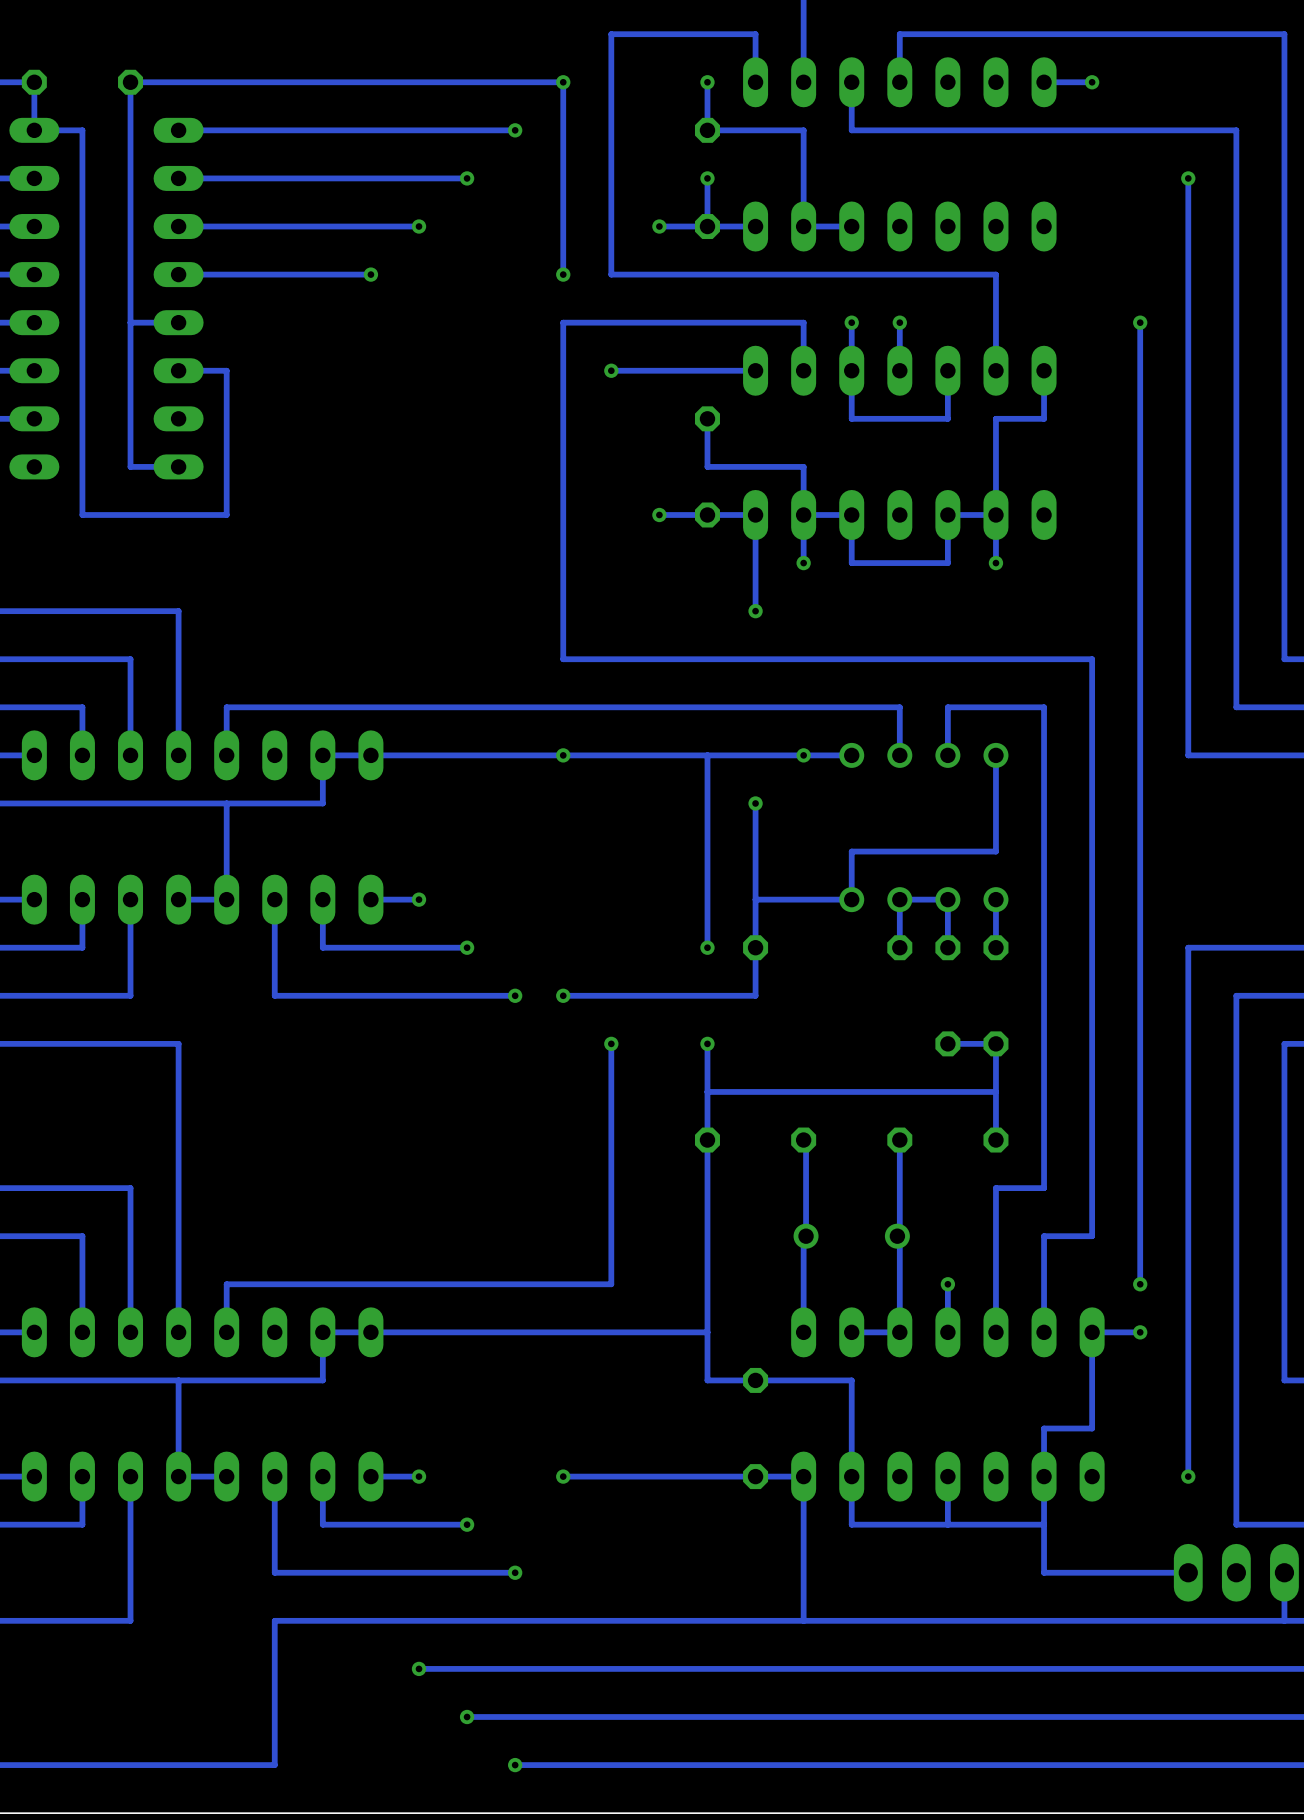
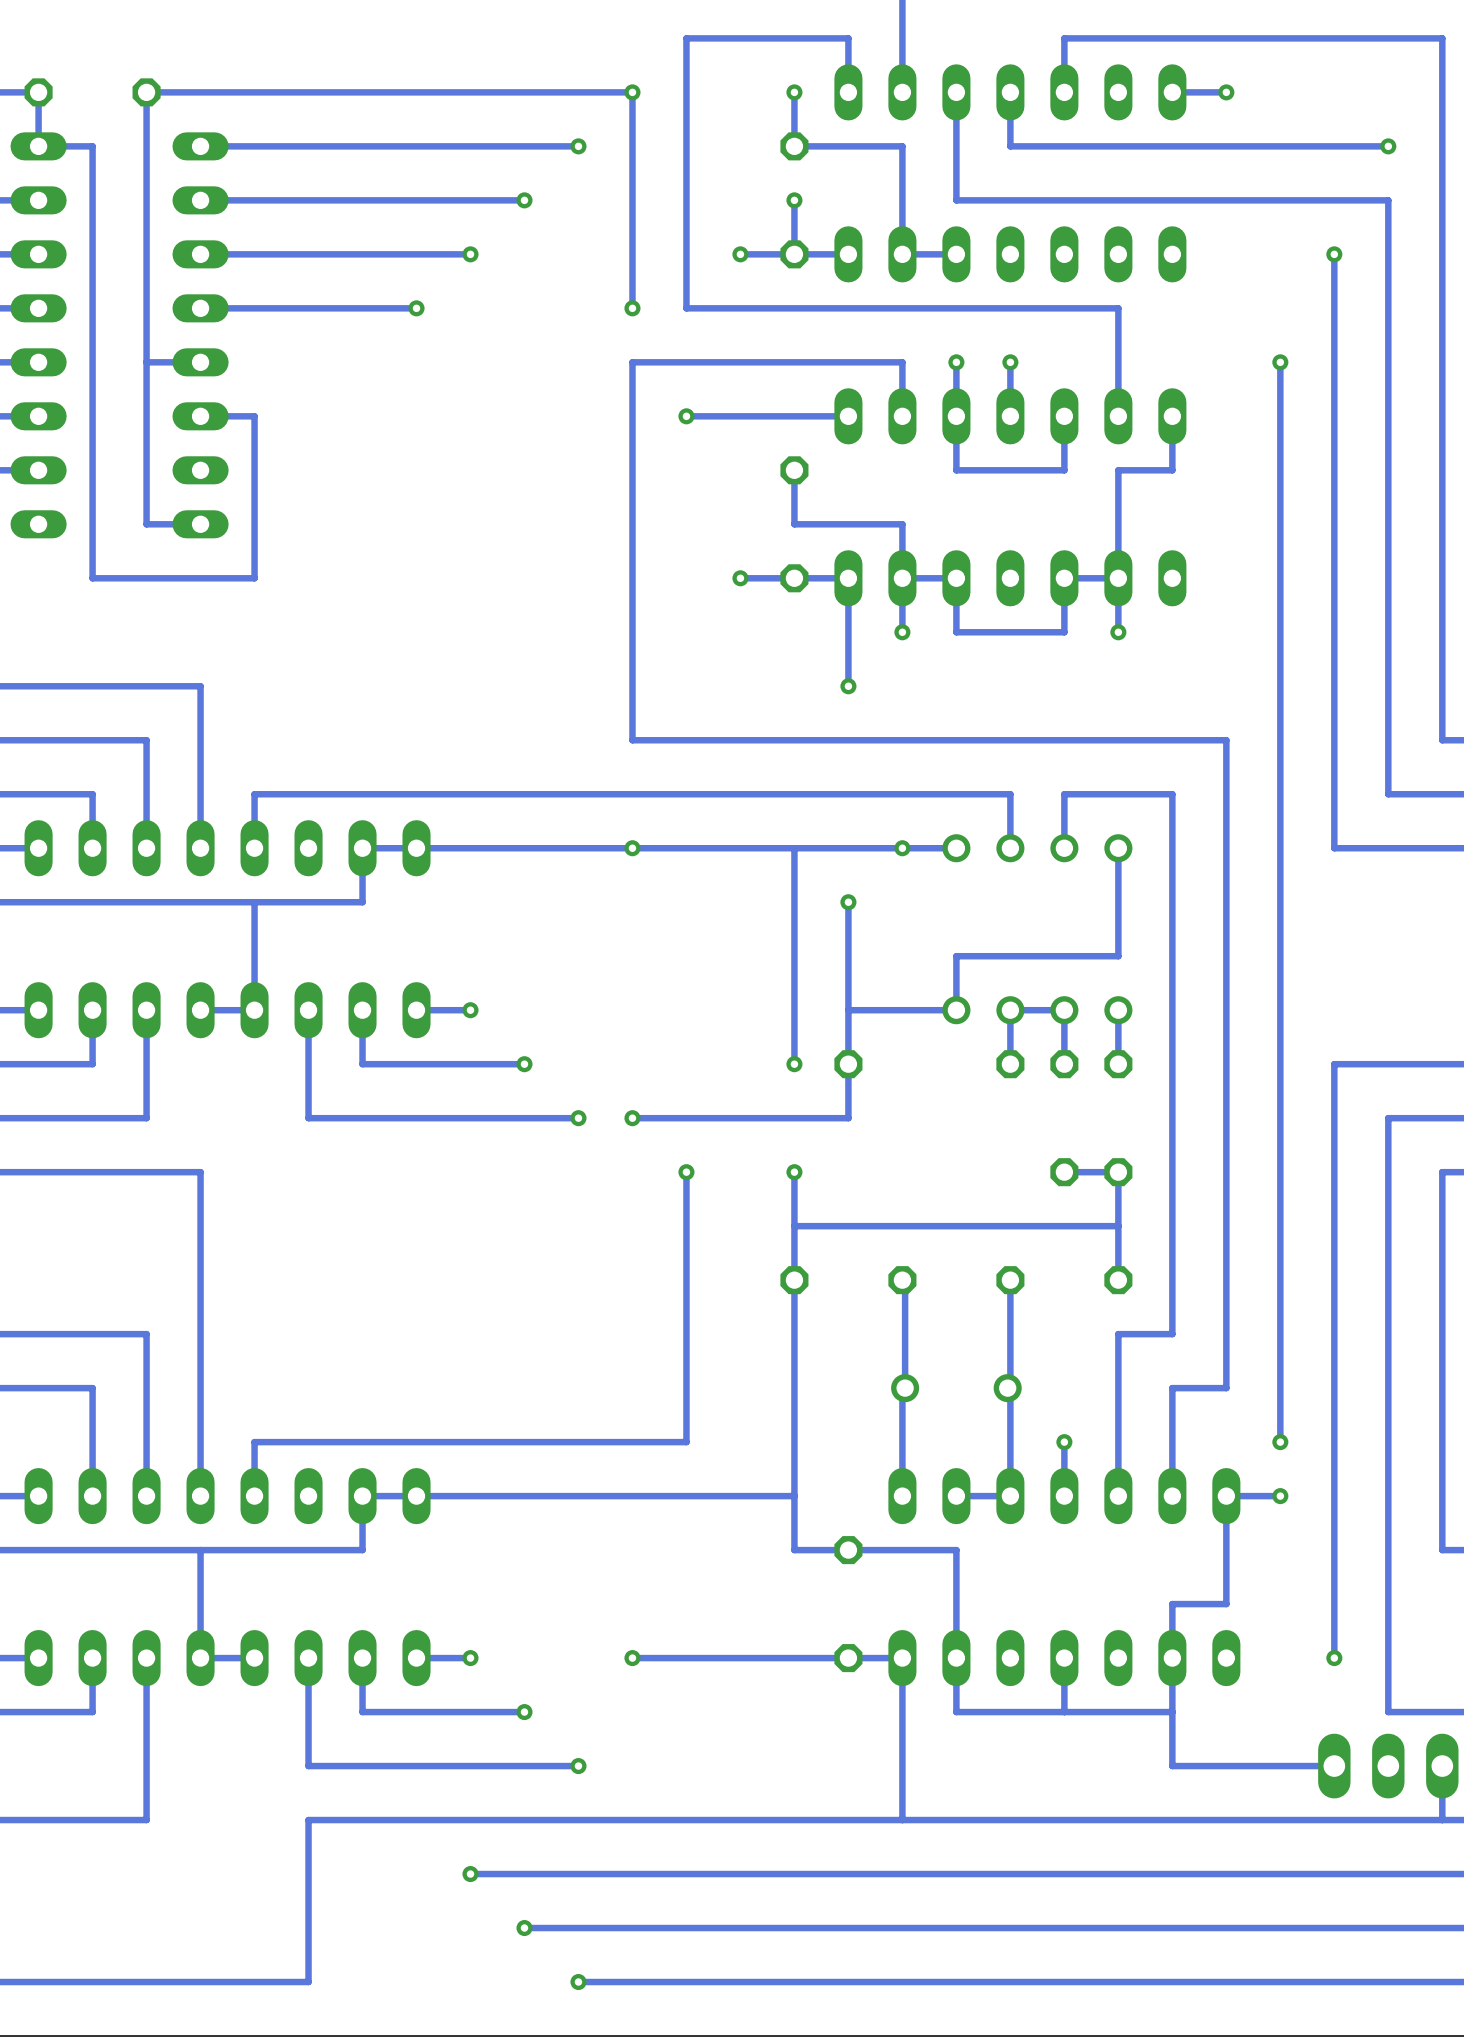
track: (947, 34) (899, 34) (899, 82) -> (1064, 38) (1064, 92)
track: (899, 130) (851, 130) -> (1010, 146) (1010, 92)
track: (1236, 130) (1236, 178) -> (956, 146) (956, 200) (1388, 200)
via: none -> (1388, 146)
track: (1188, 178) (1188, 226) -> none
via: (1188, 178) -> none
via: none -> (1334, 254)

